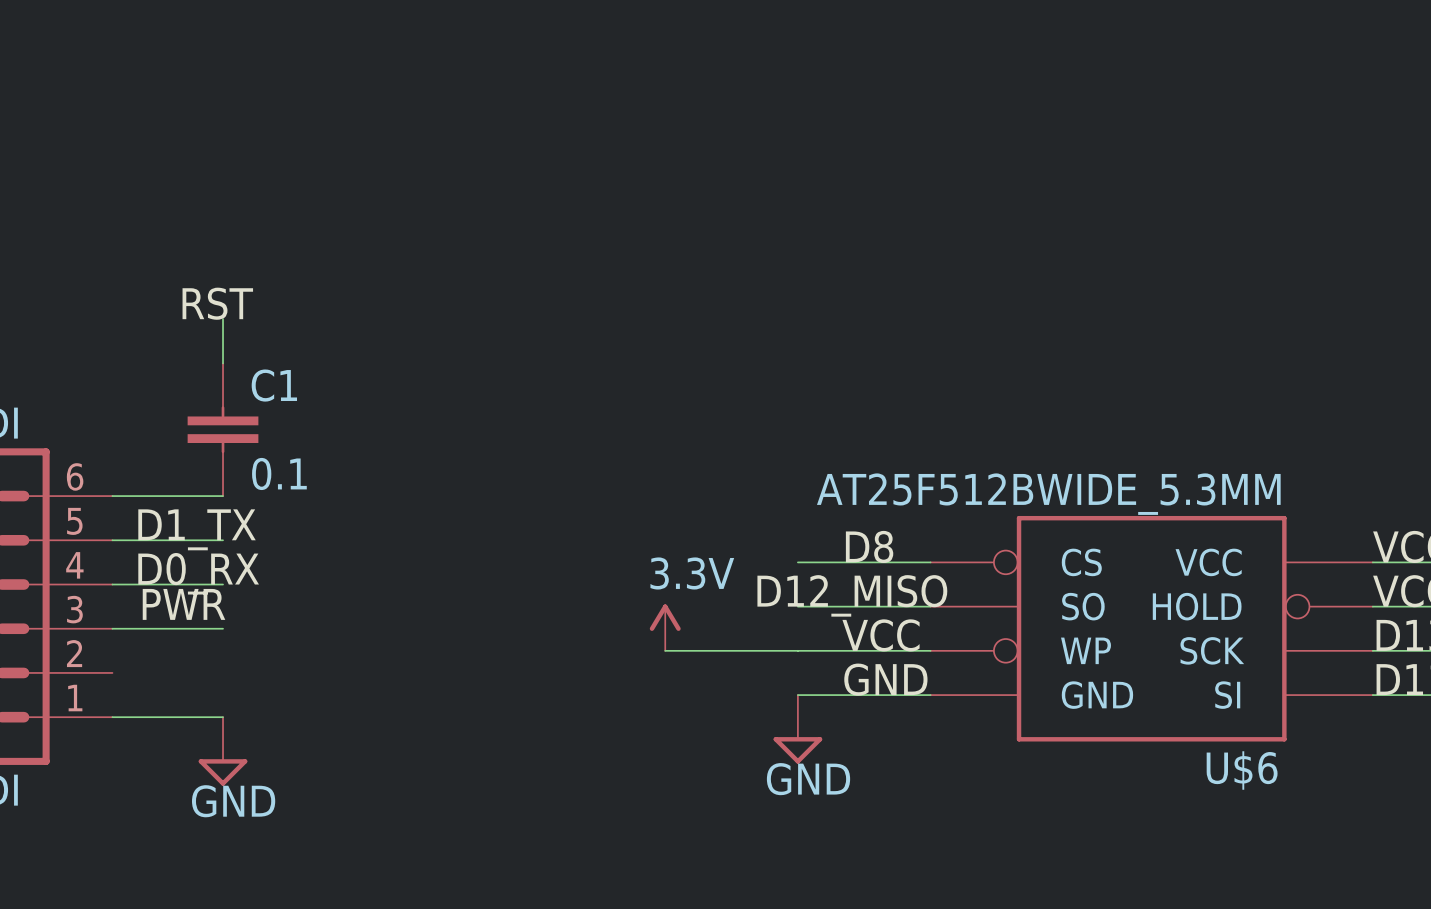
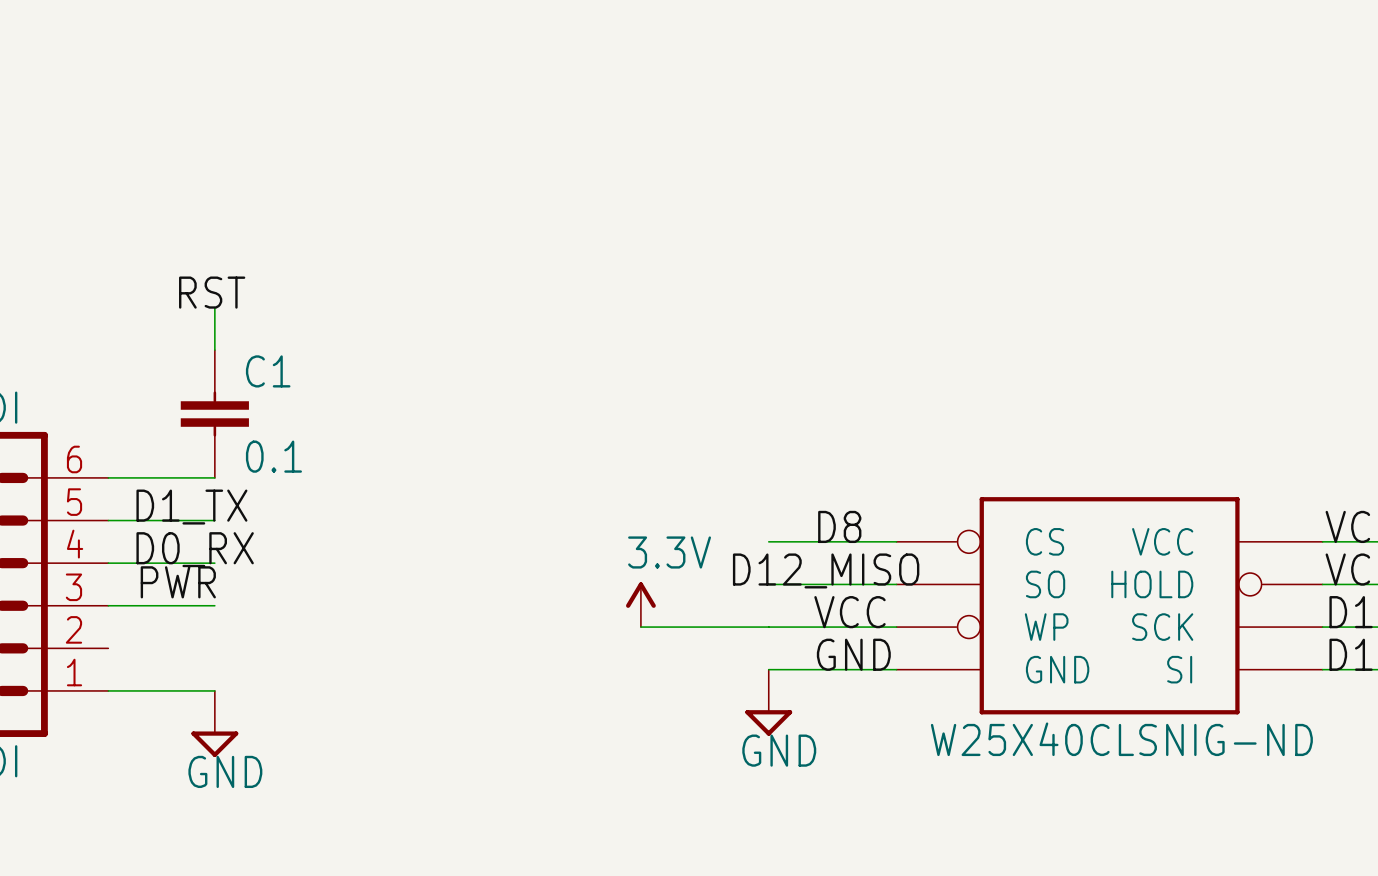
U$6 value: AT25F512BWIDE_5.3MM (1048, 494) -> none
U$6 name: U$6 (1242, 770) -> W25X40CLSNIG-ND (1121, 739)

